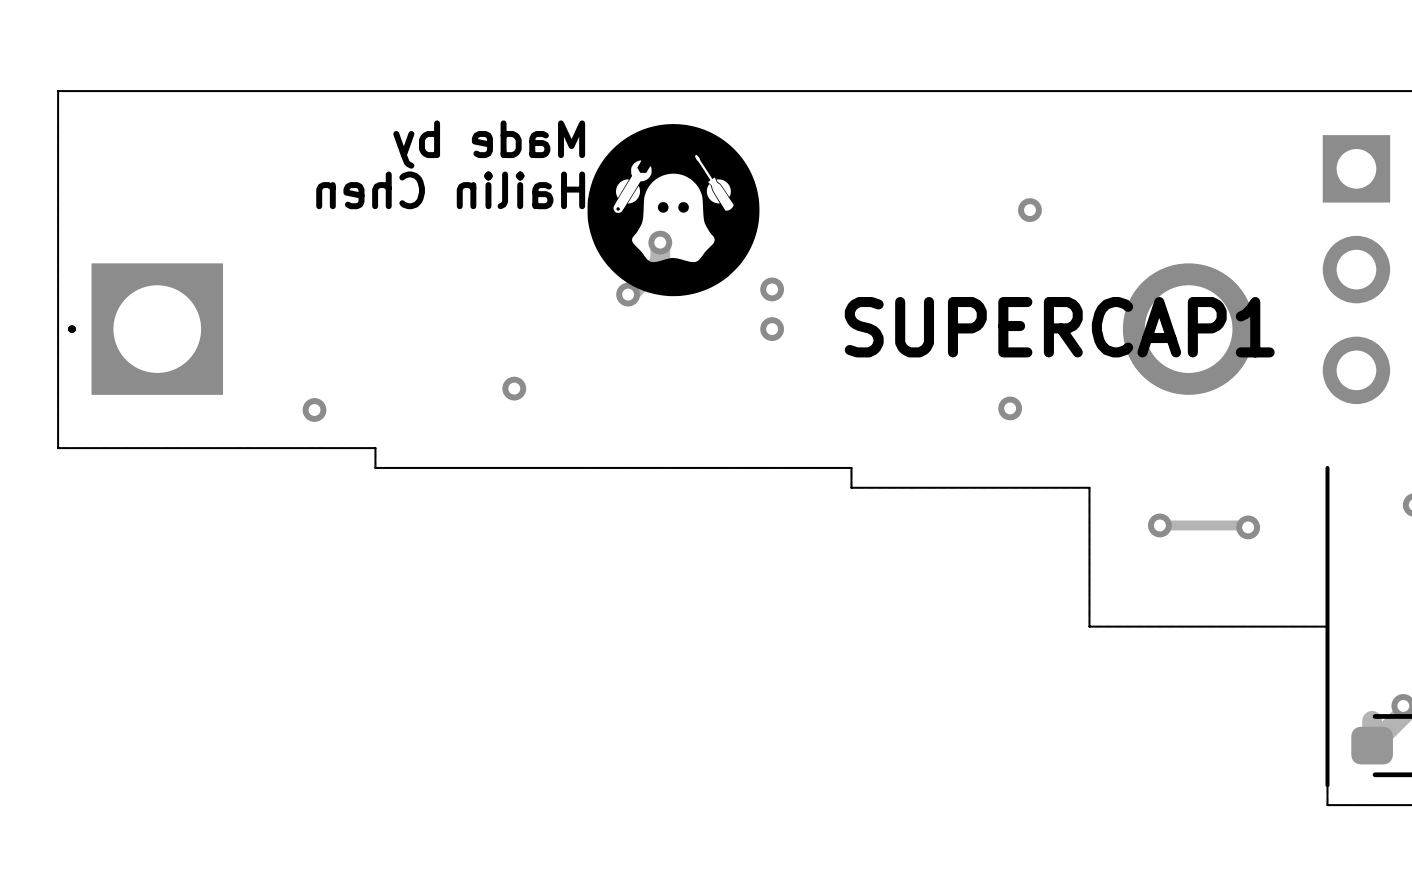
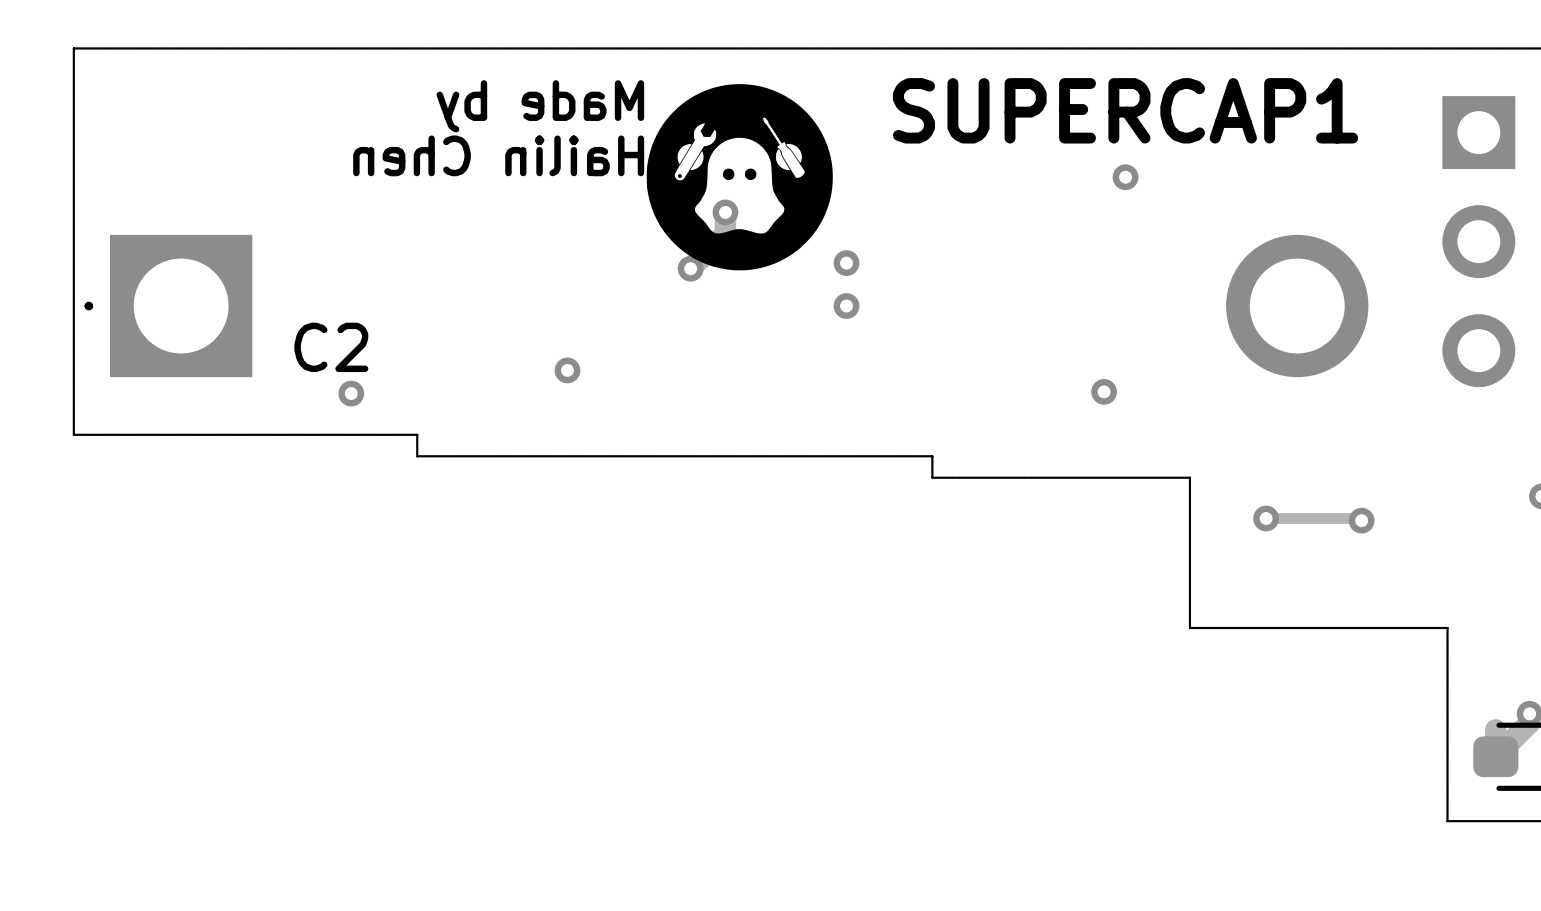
SUPERCAP1 name position: SUPERCAP1 (1059, 327) -> SUPERCAP1 (1125, 110)
C2: none -> (331, 347)
line: (1327, 467) (1327, 785) -> none

